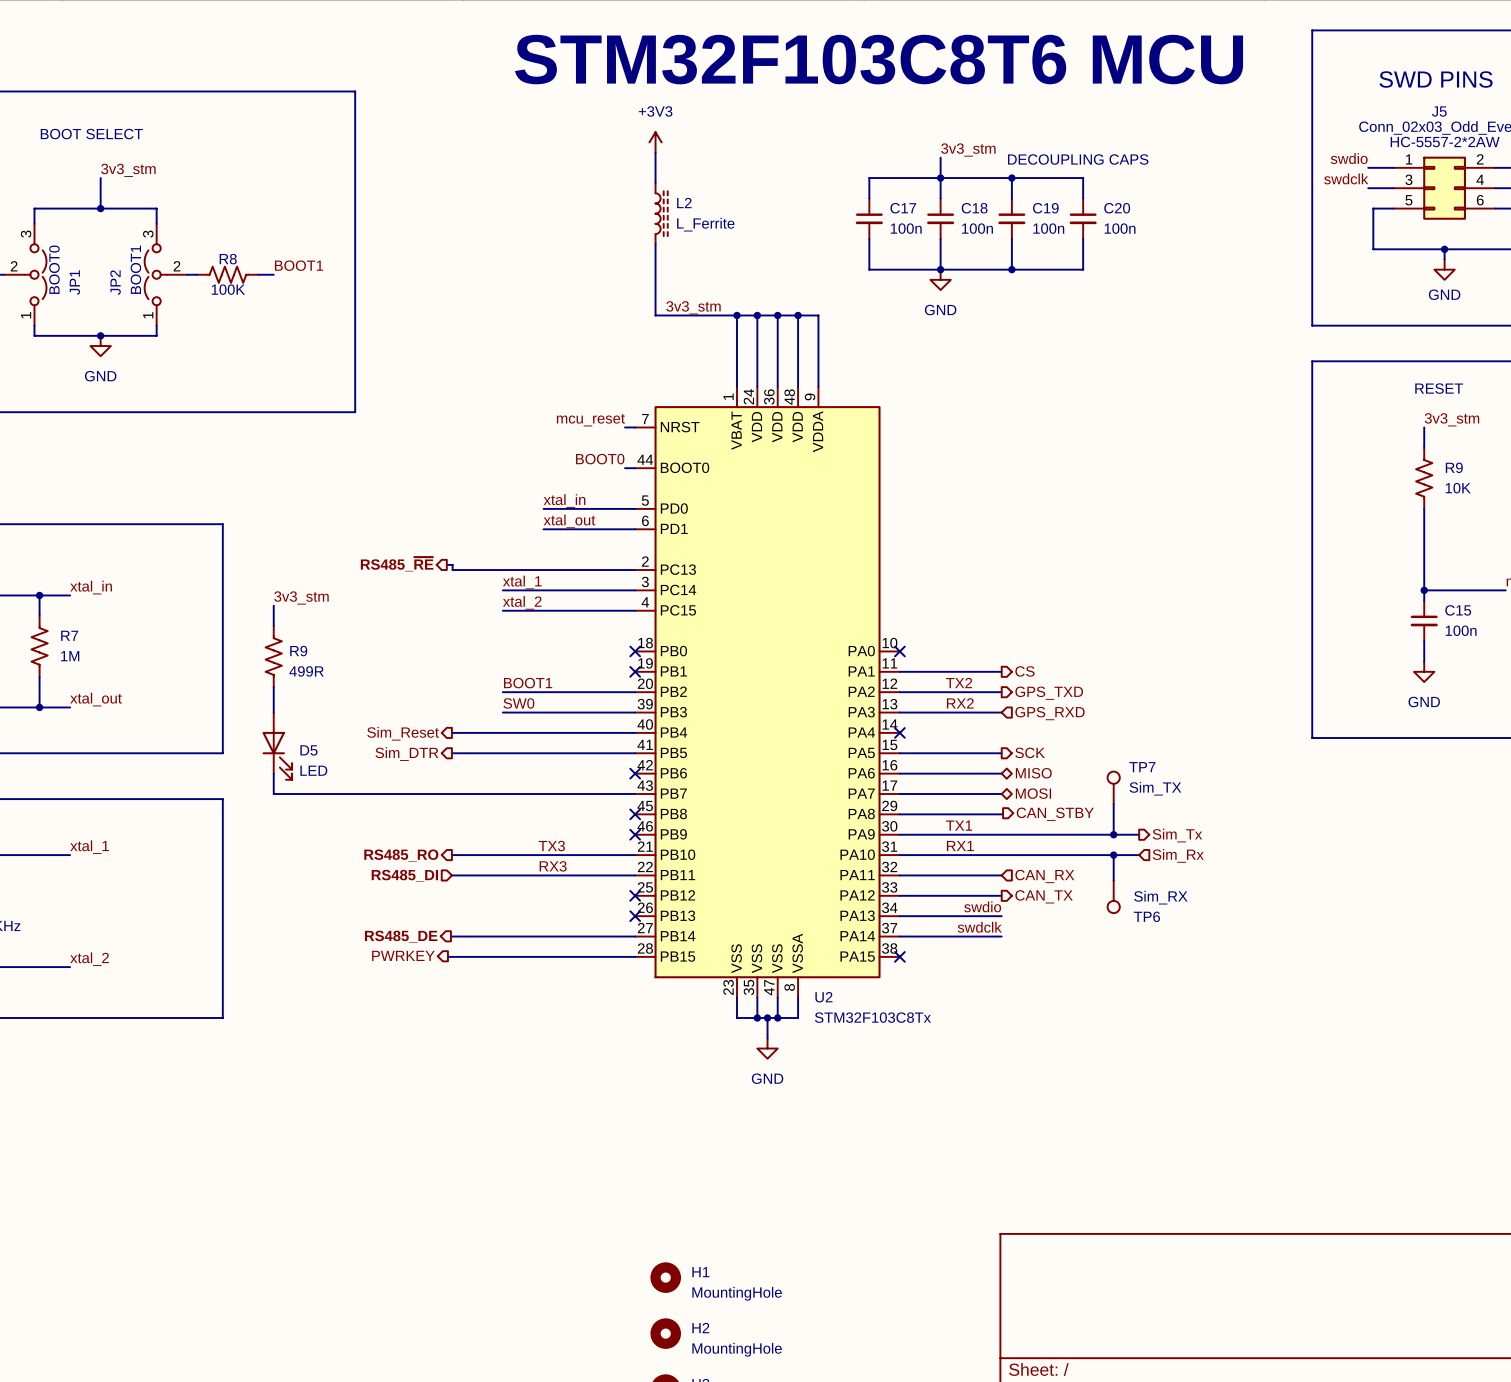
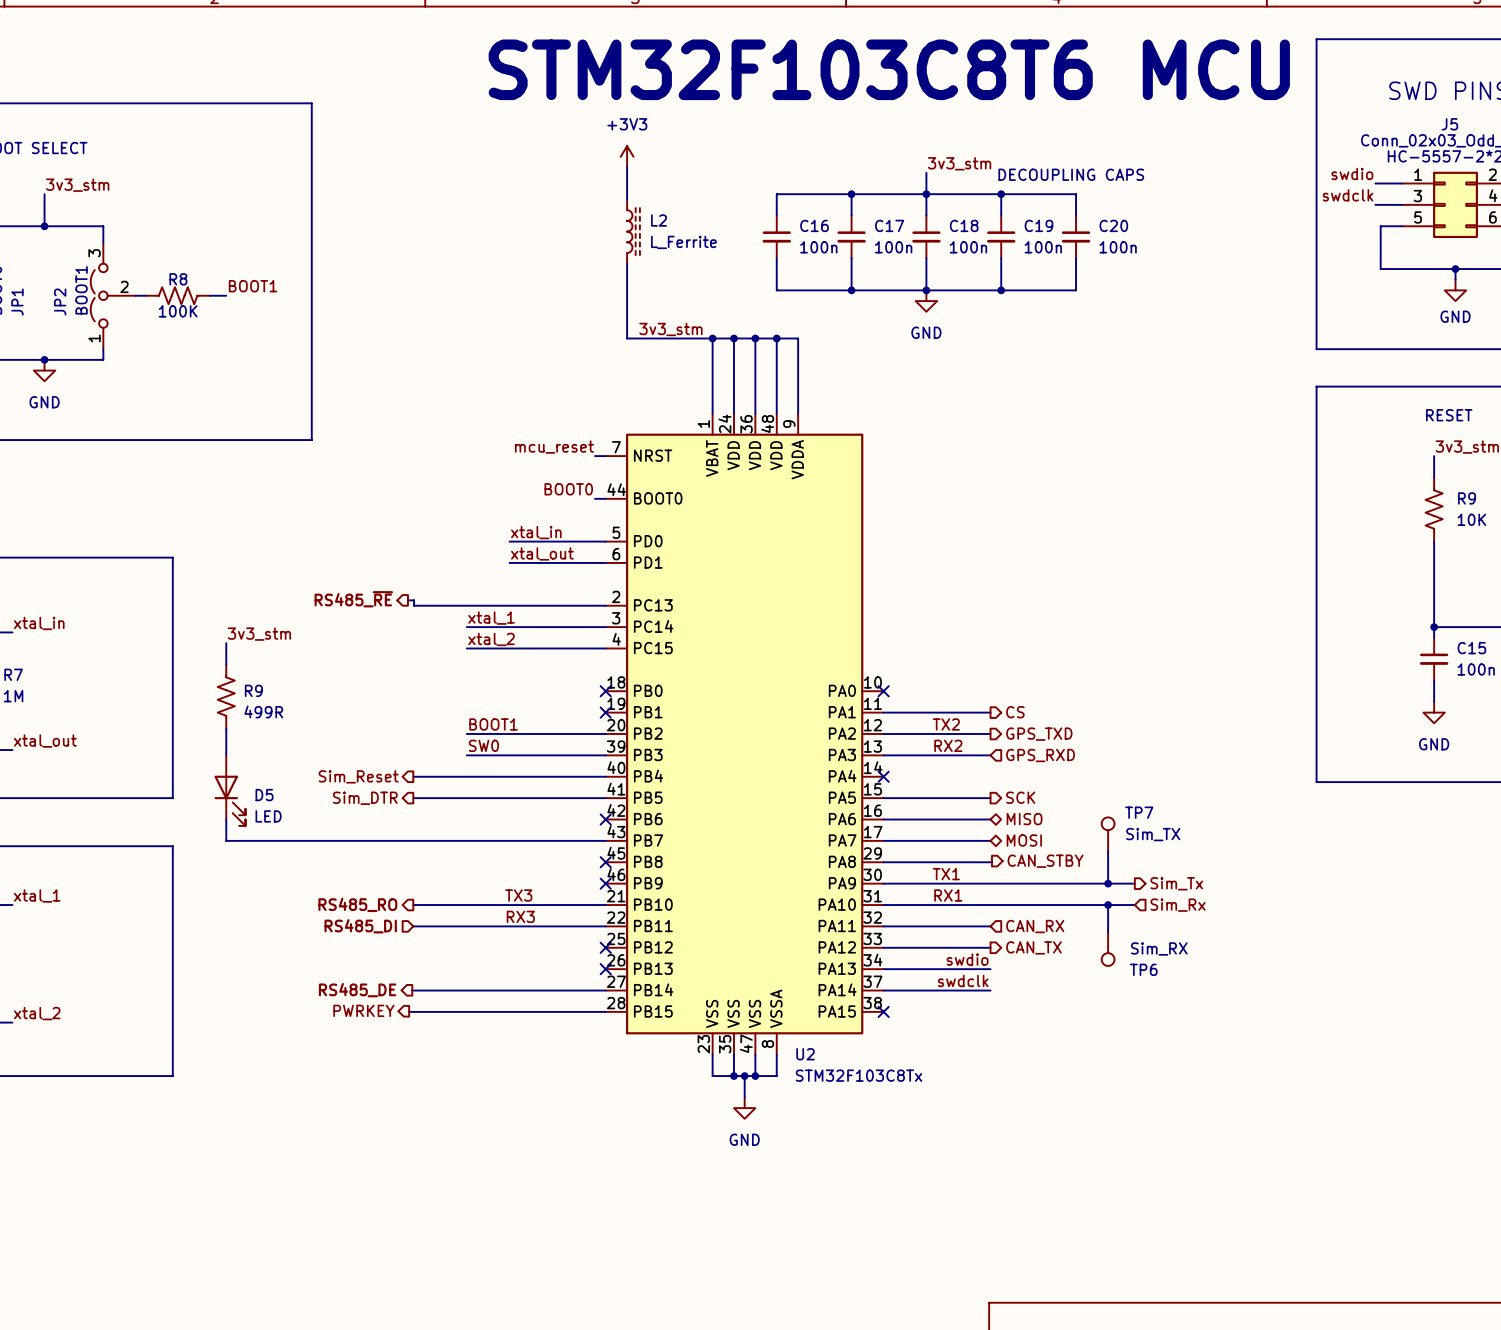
wire: none -> (851, 194) (776, 194) (776, 215)
junction: none -> (851, 194)
C16: none -> 100n (776, 236)
wire: none -> (776, 258) (776, 290) (851, 290)
junction: none -> (851, 290)

